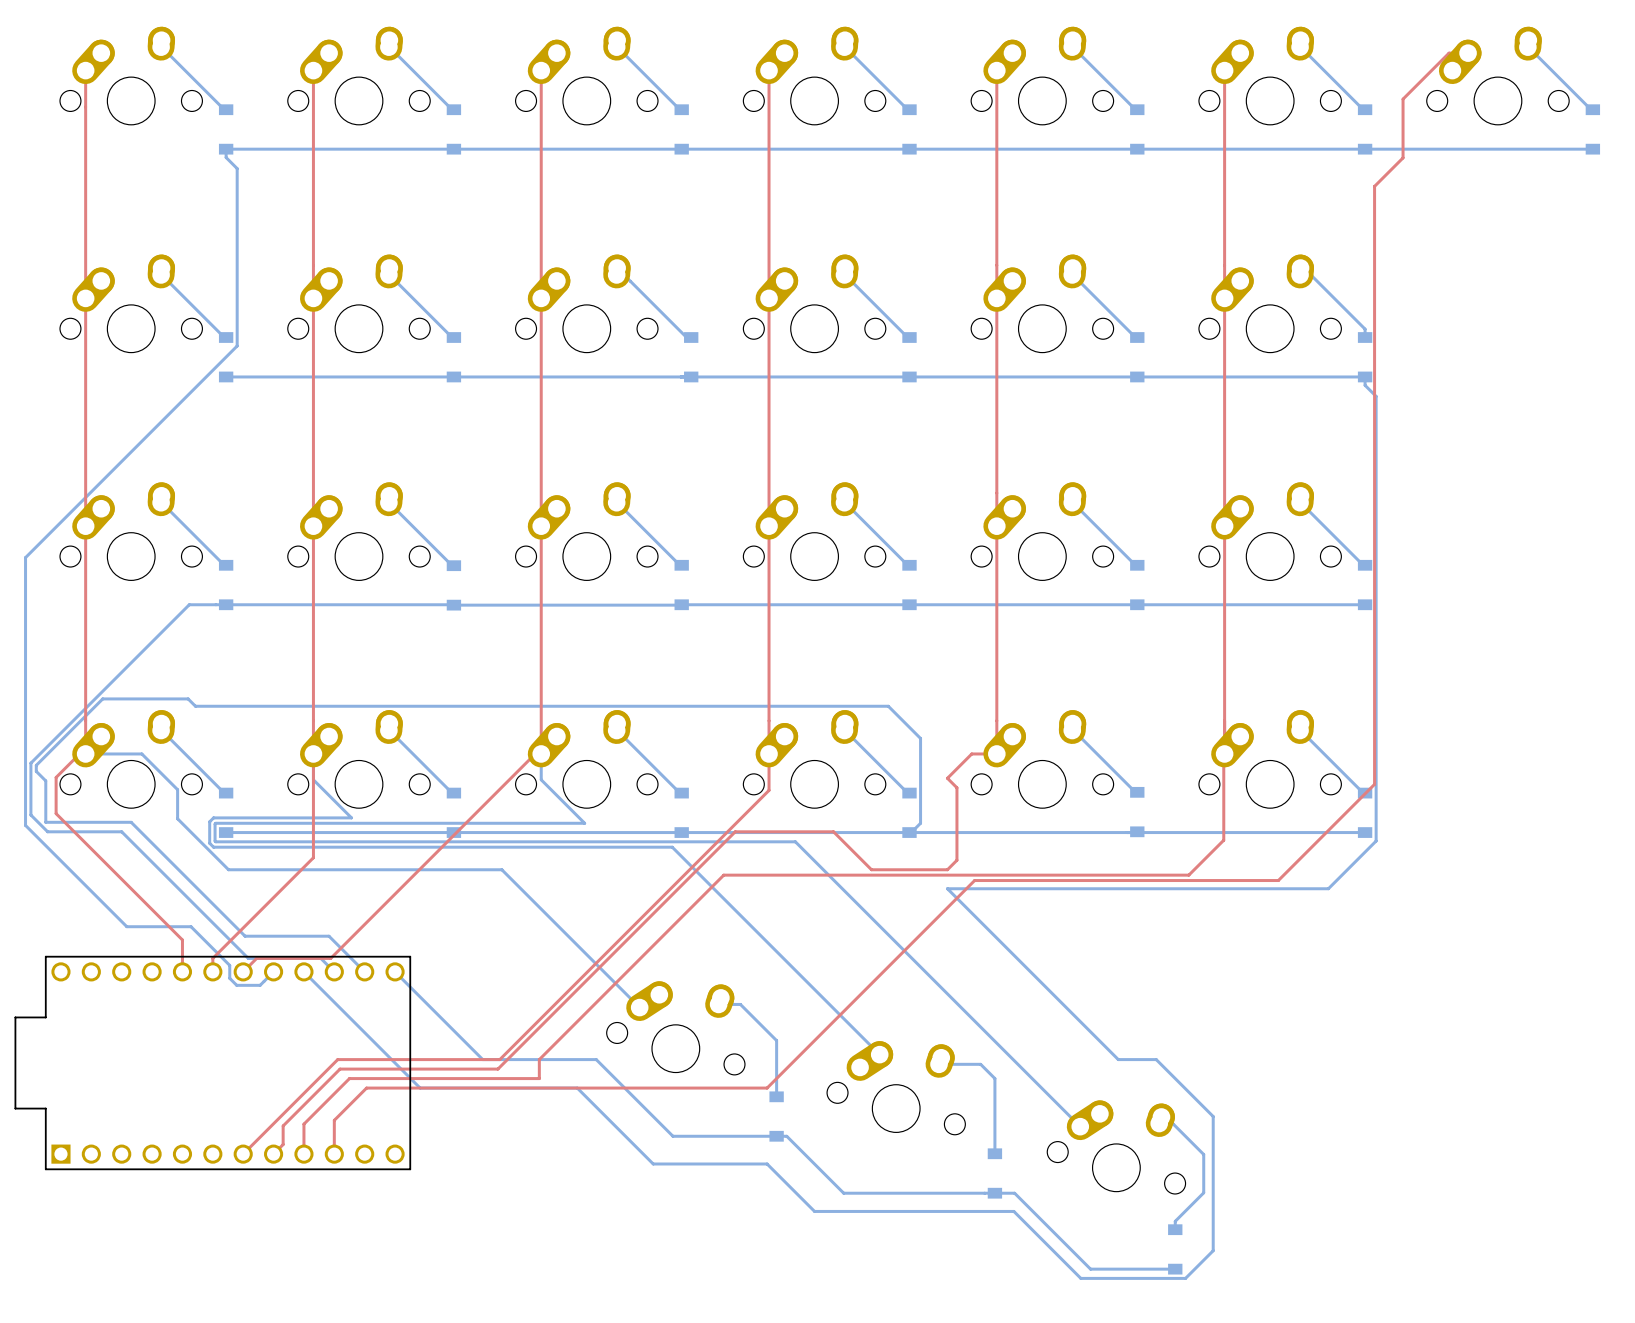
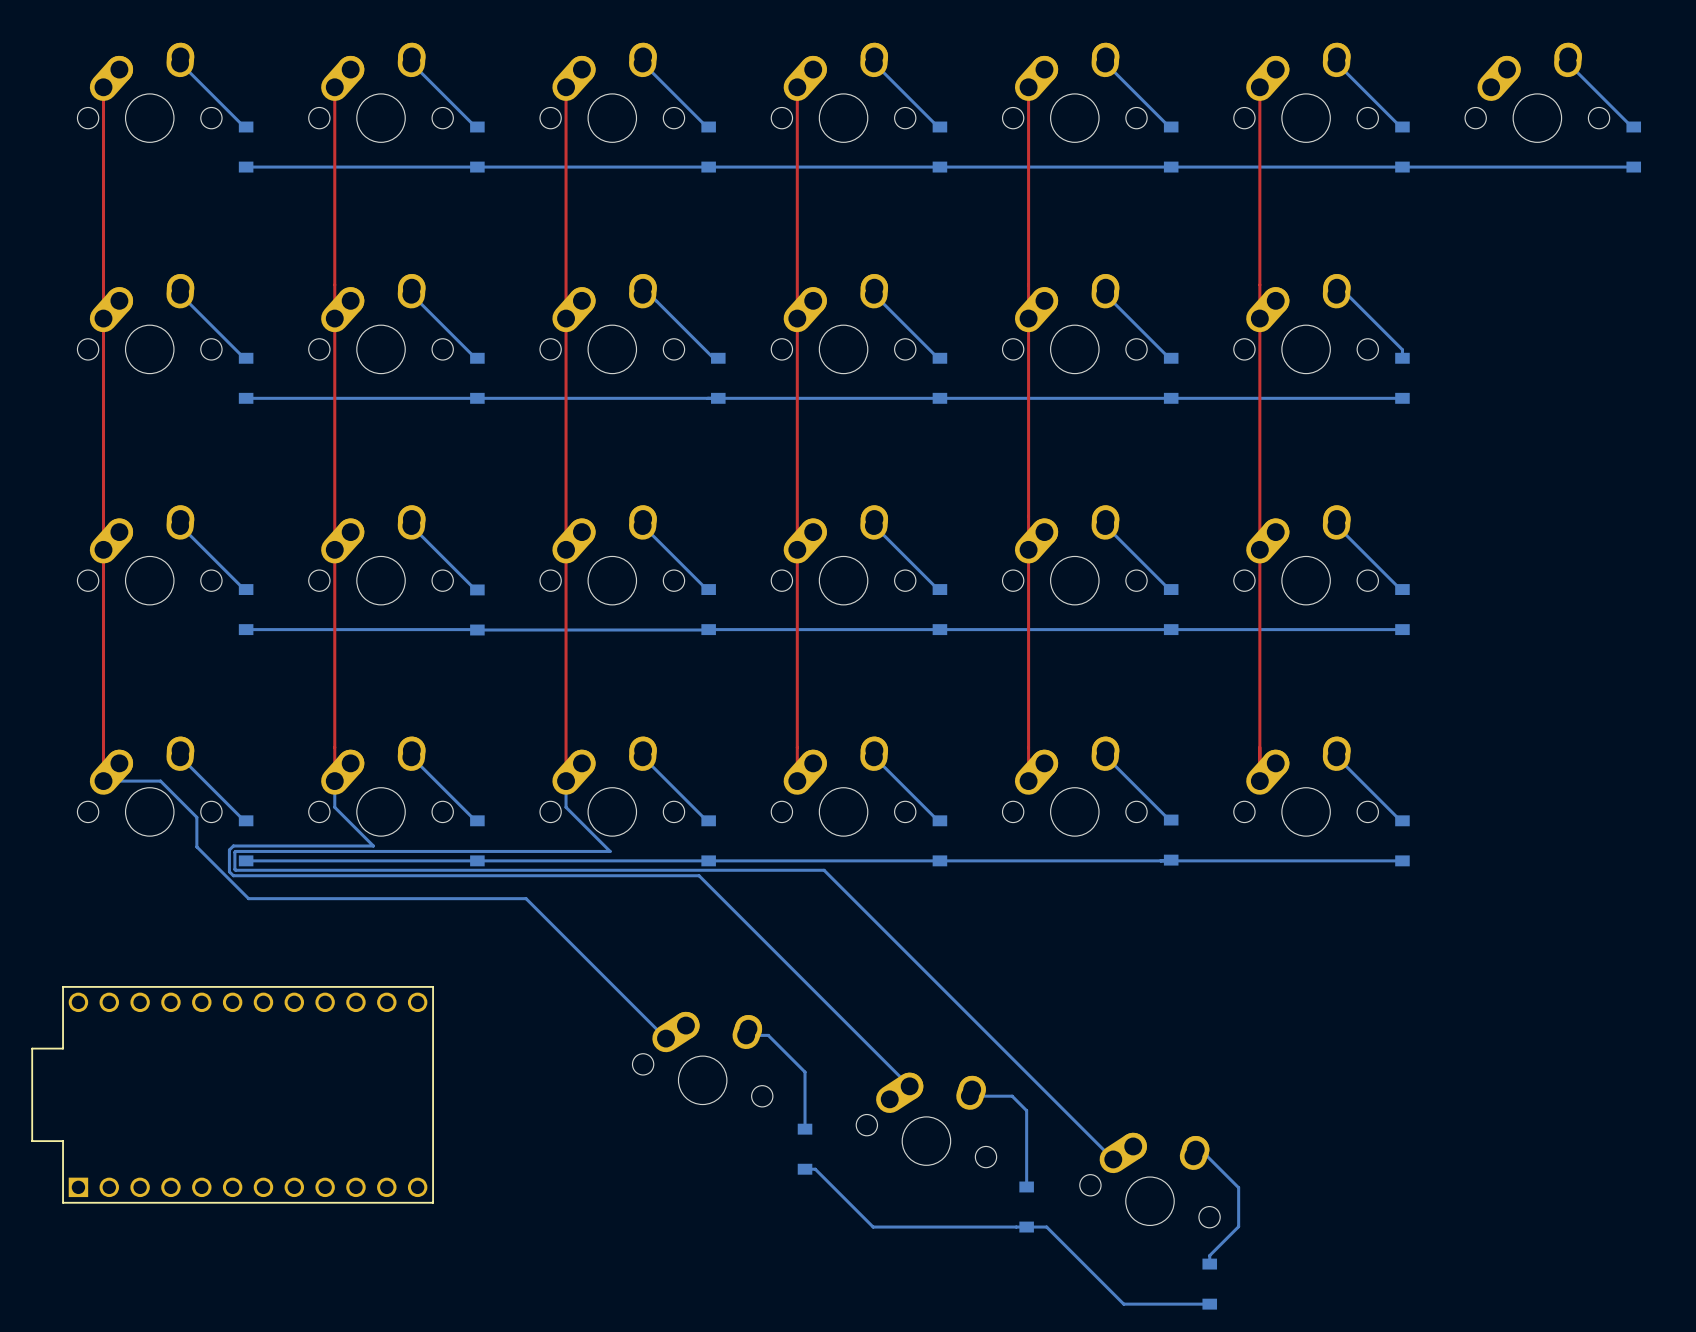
top track: (1468, 53) (1449, 53) (1403, 99) (1403, 157) (1374, 186) (1374, 784) (1278, 880) (974, 880) (767, 1088) (366, 1088) (334, 1120) (334, 1154) -> none
bottom track: (226, 149) (226, 157) (237, 168) (237, 345) (25, 557) (25, 825) (126, 926) (191, 926) (229, 965) (229, 978) (236, 985) (260, 985) (273, 971) -> none
bottom track: (1365, 376) (1365, 385) (1376, 396) (1376, 841) (1328, 888) (947, 888) (1118, 1059) (1156, 1059) (1213, 1116) (1213, 1250) (1185, 1278) (1080, 1278) (1013, 1211) (814, 1211) (767, 1163) (653, 1163) (577, 1088) (420, 1088) (303, 971) -> none
bottom track: (226, 604) (189, 604) (30, 763) (30, 815) (47, 831) (121, 831) (248, 958) (320, 958) (334, 971) -> none
top track: (85, 753) (79, 753) (56, 777) (56, 813) (182, 940) (182, 971) -> none
top track: (313, 753) (313, 857) (212, 958) (212, 971) -> none
top track: (541, 753) (535, 753) (330, 958) (256, 958) (243, 971) -> none
top track: (769, 753) (769, 790) (499, 1059) (337, 1059) (243, 1154) -> none
top track: (996, 753) (971, 753) (947, 778) (956, 787) (956, 860) (947, 869) (871, 869) (833, 831) (735, 831) (497, 1069) (340, 1069) (283, 1125) (283, 1144) (273, 1154) -> none
top track: (1224, 753) (1223, 840) (1188, 875) (723, 875) (539, 1059) (539, 1078) (349, 1078) (303, 1124) (303, 1154) -> none
bottom track: (911, 832) (920, 823) (920, 738) (888, 706) (195, 706) (188, 698) (102, 698) (36, 765) (36, 771) (45, 780) (45, 822) (131, 822) (245, 936) (329, 936) (364, 971) -> none
bottom track: (395, 971) (482, 1059) (596, 1059) (672, 1136) (776, 1136) -> none

